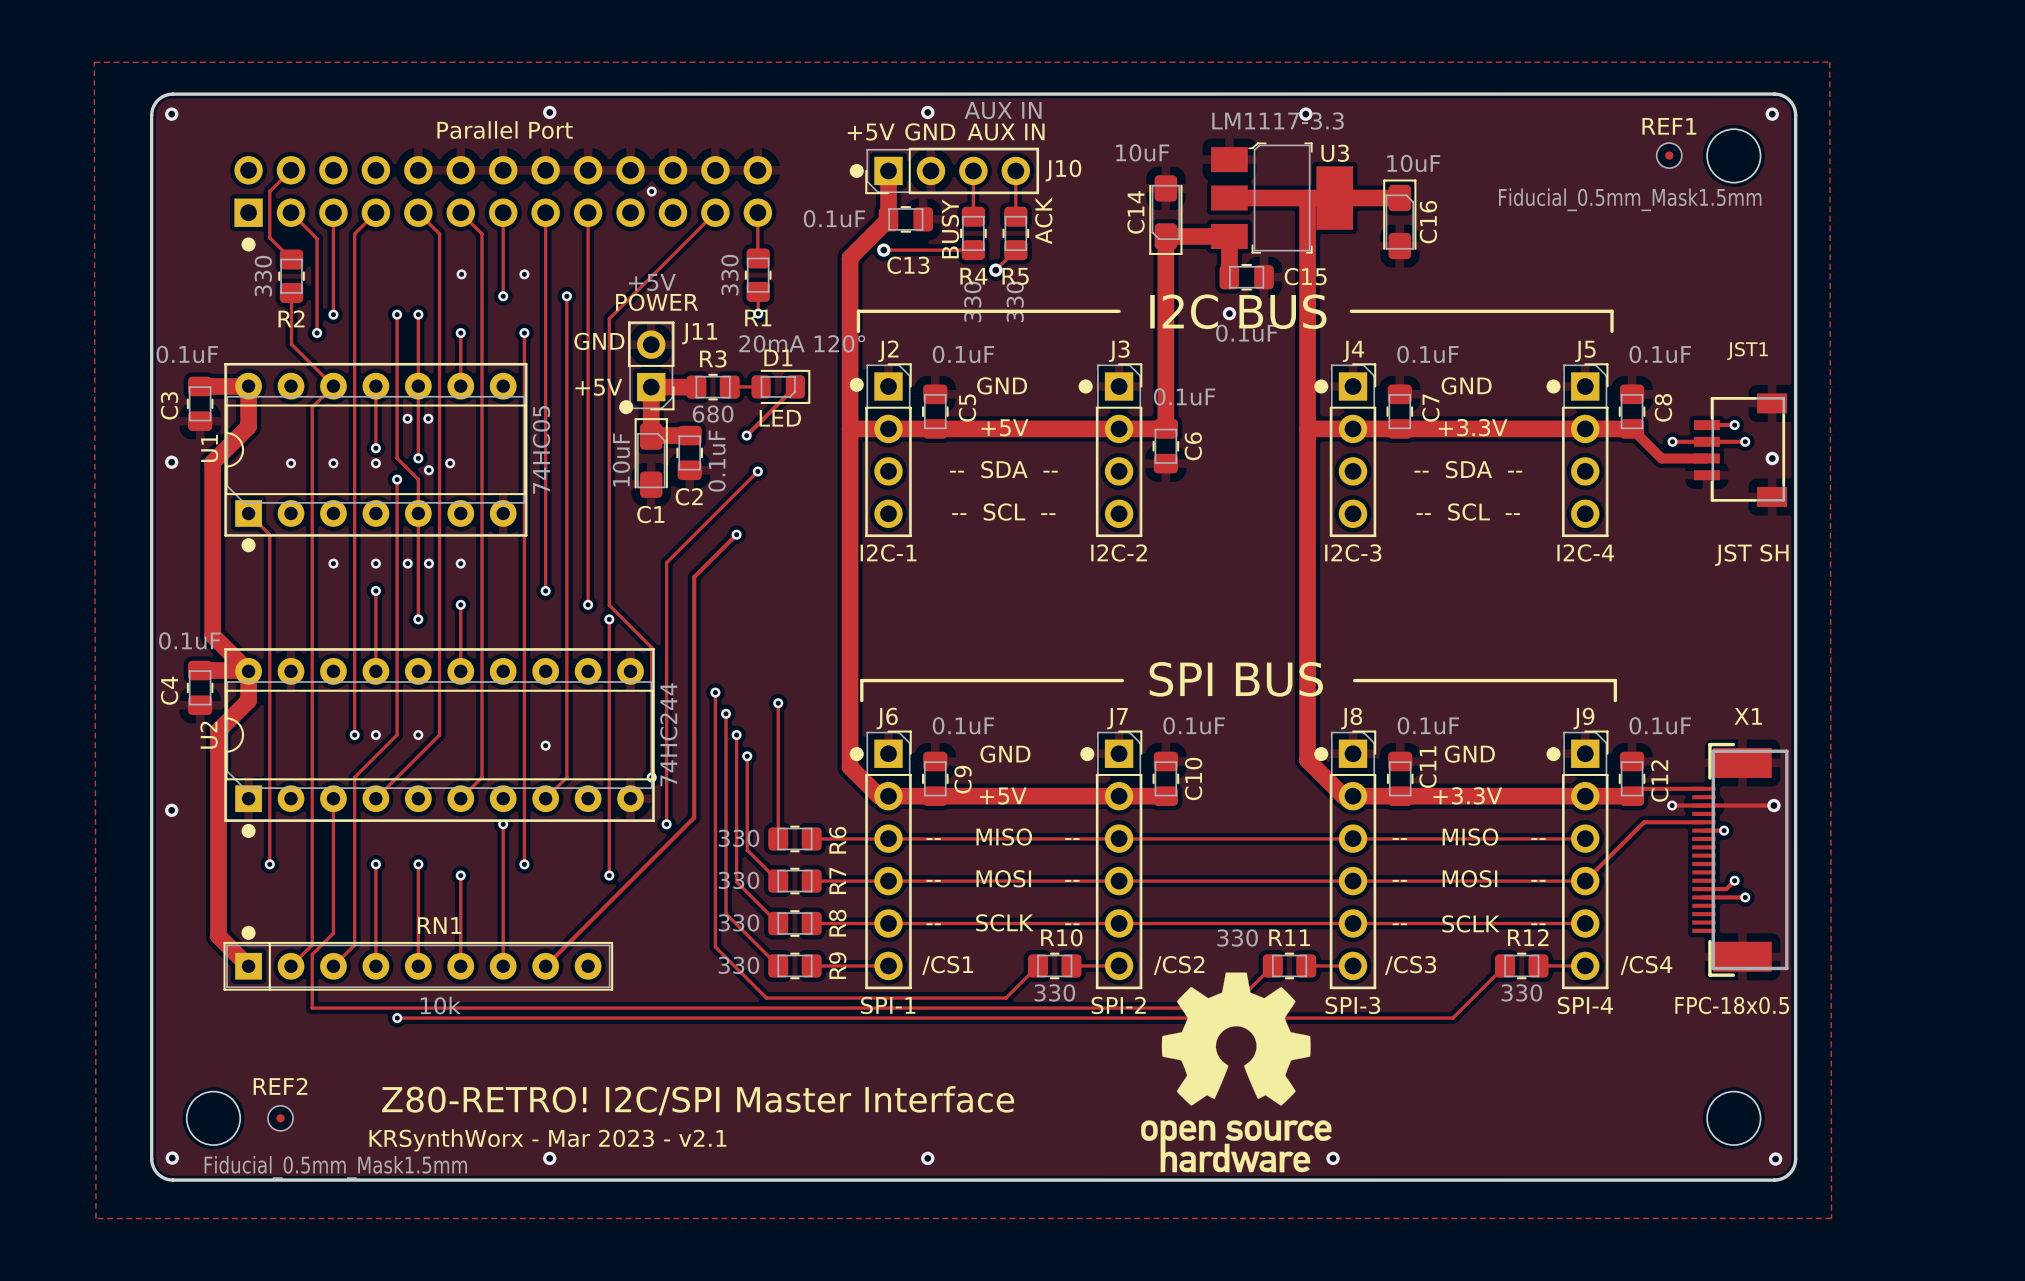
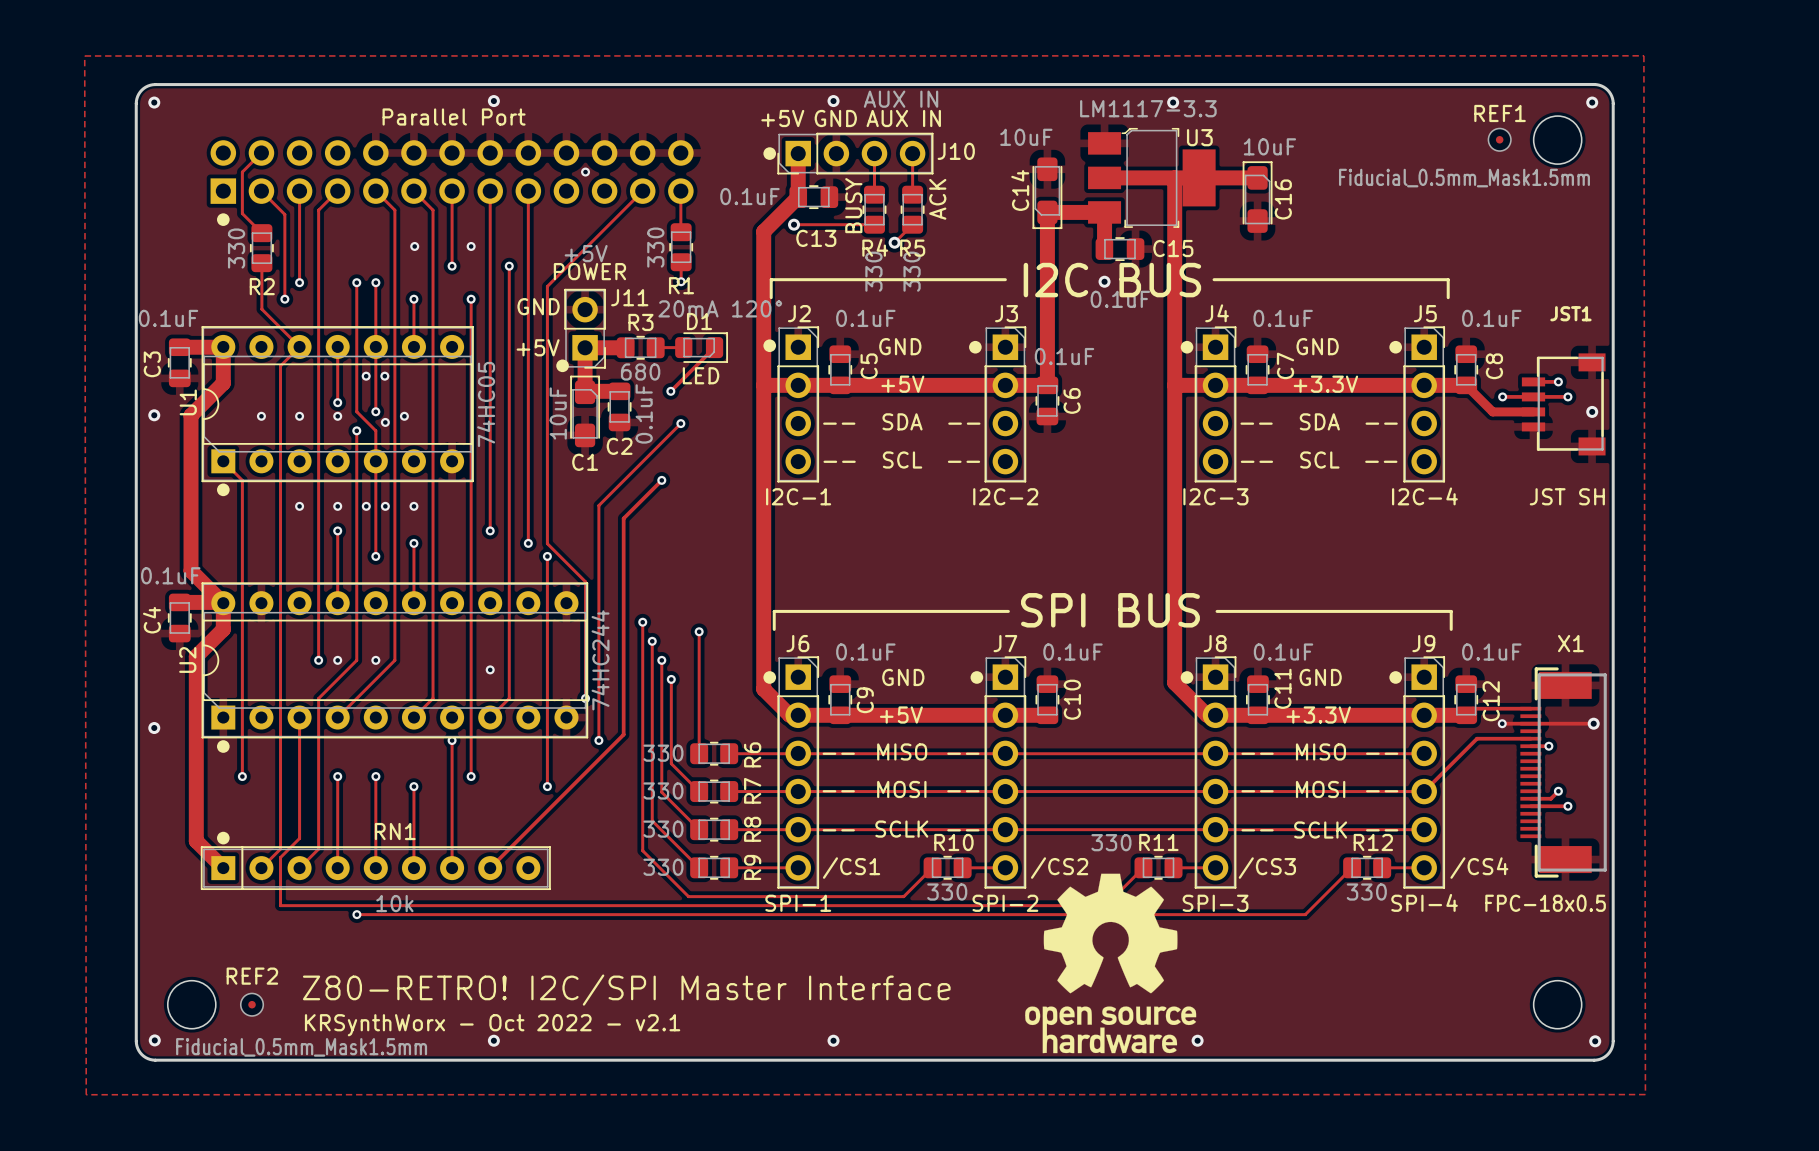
text: KRSynthWorx - Mar 2023 - v2.1 (547, 1140) -> KRSynthWorx - Oct 2022 - v2.1 (492, 1025)

